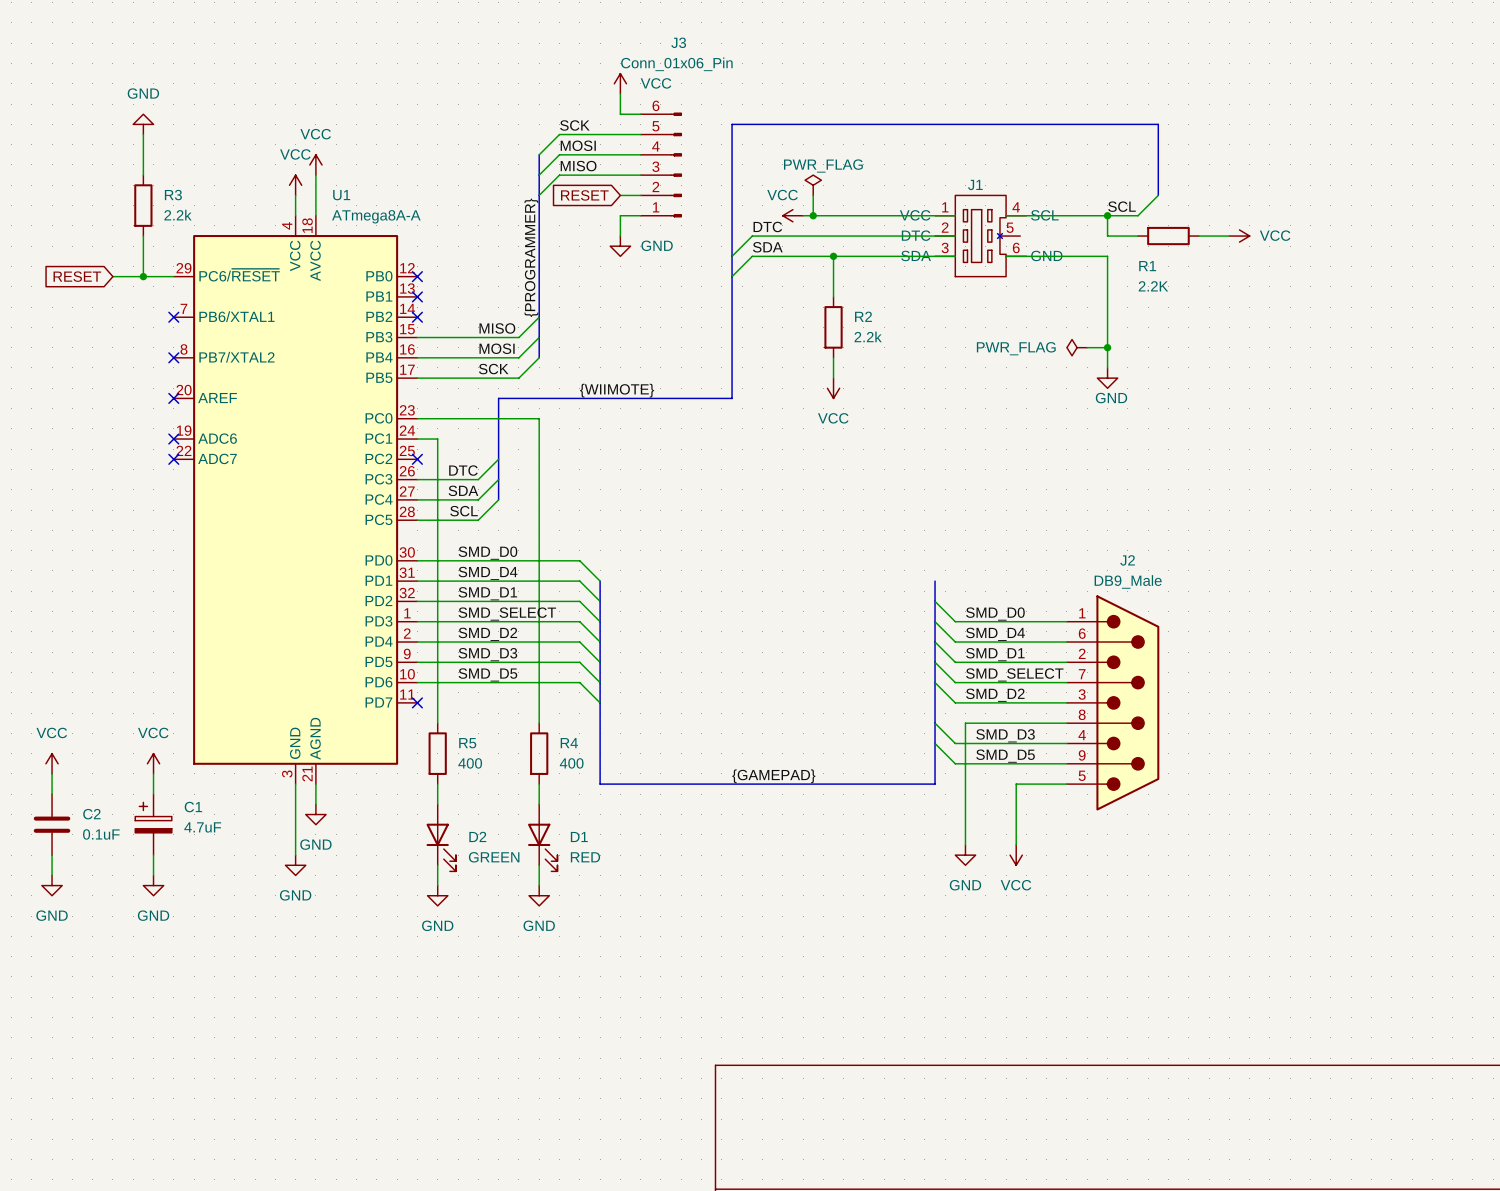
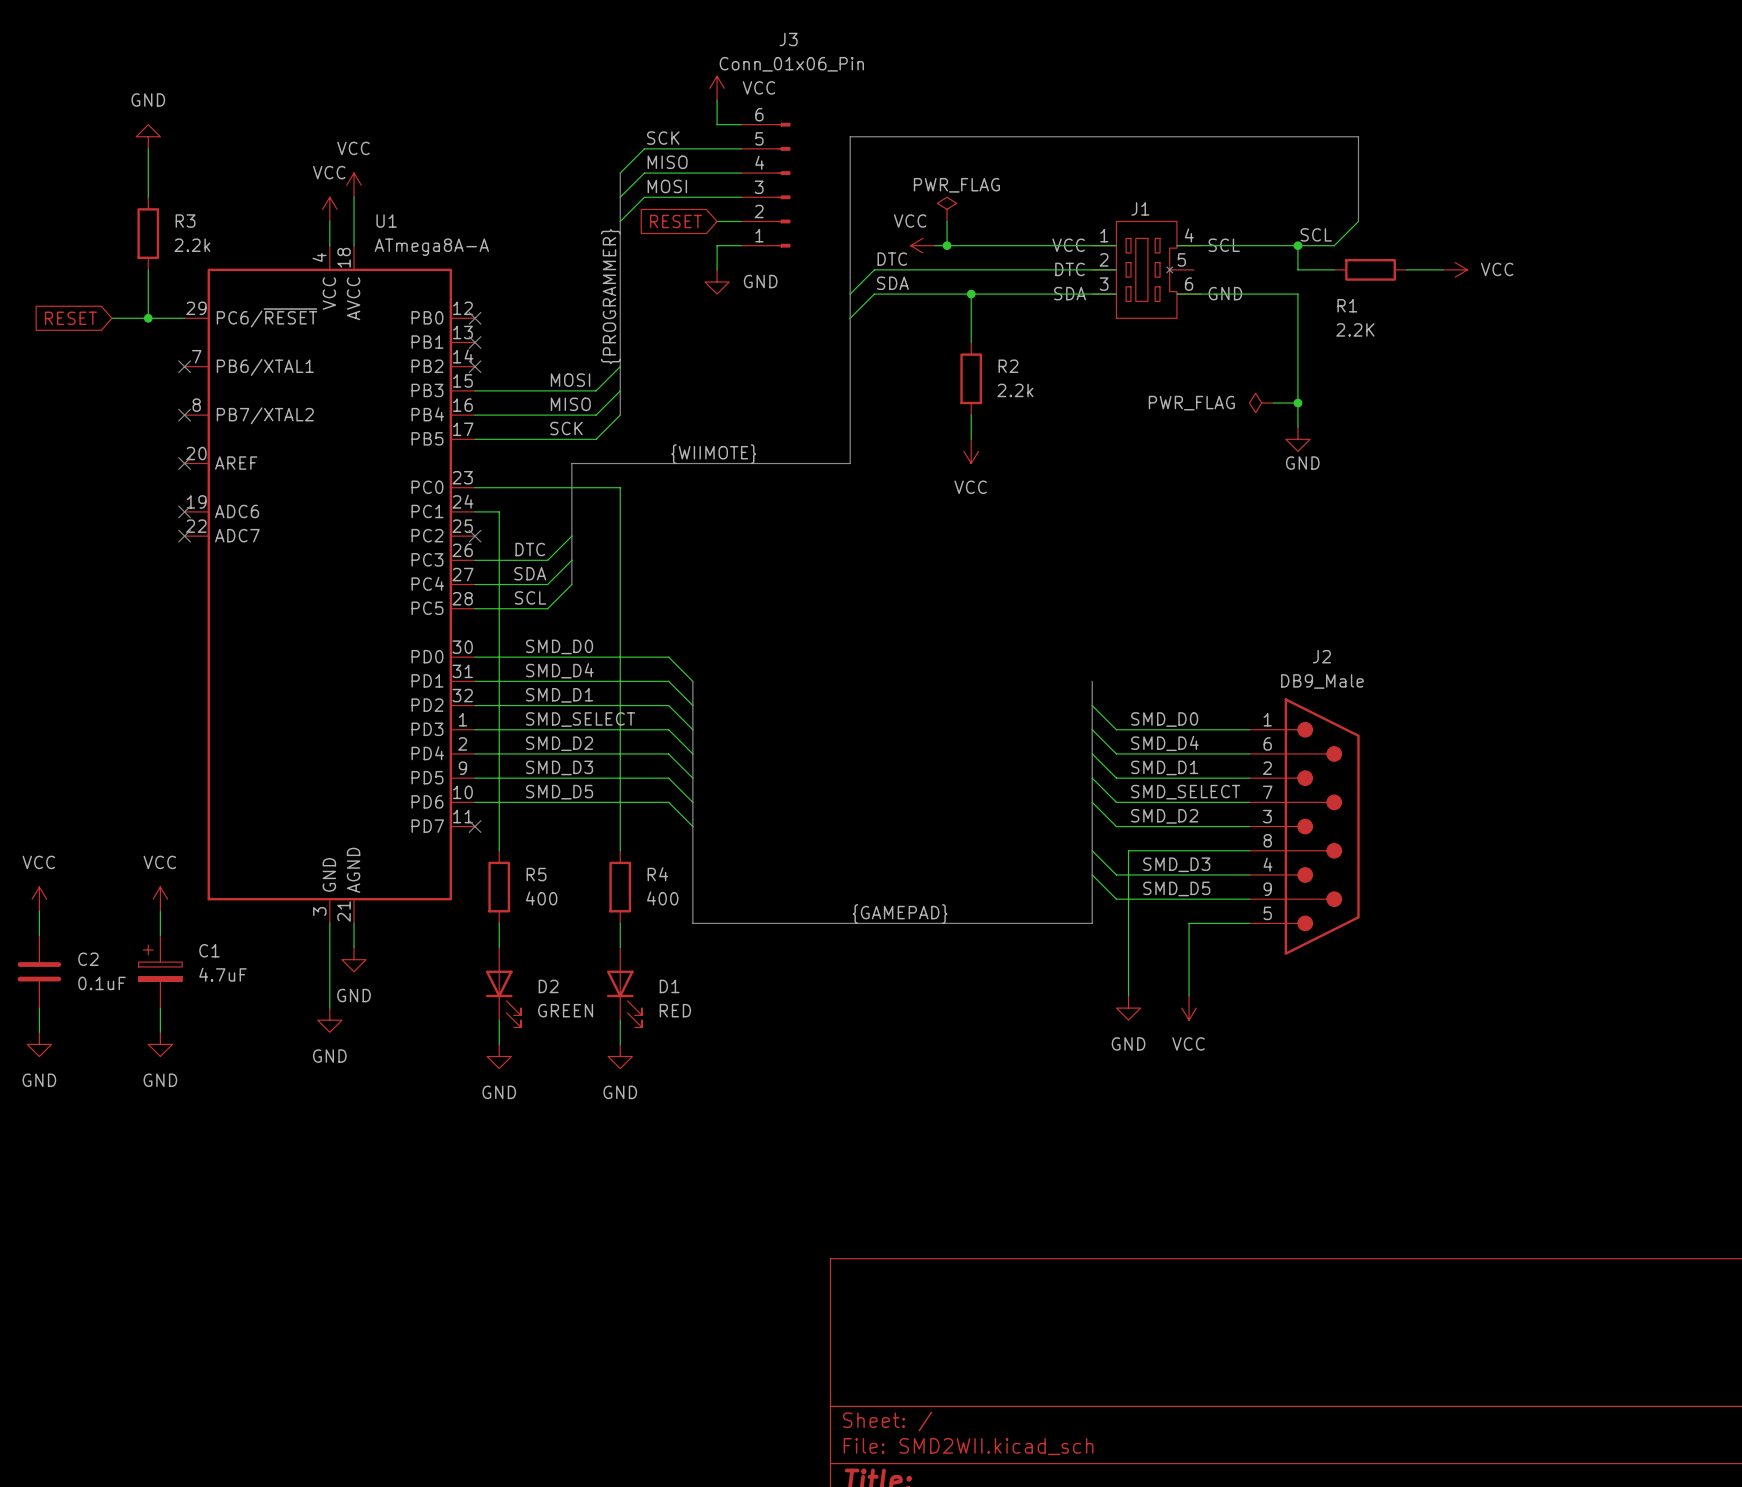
label: MOSI (578, 145) -> MISO (667, 162)
label: MISO (578, 166) -> MOSI (667, 186)
label: MISO (497, 328) -> MOSI (570, 380)
label: MOSI (497, 348) -> MISO (570, 404)

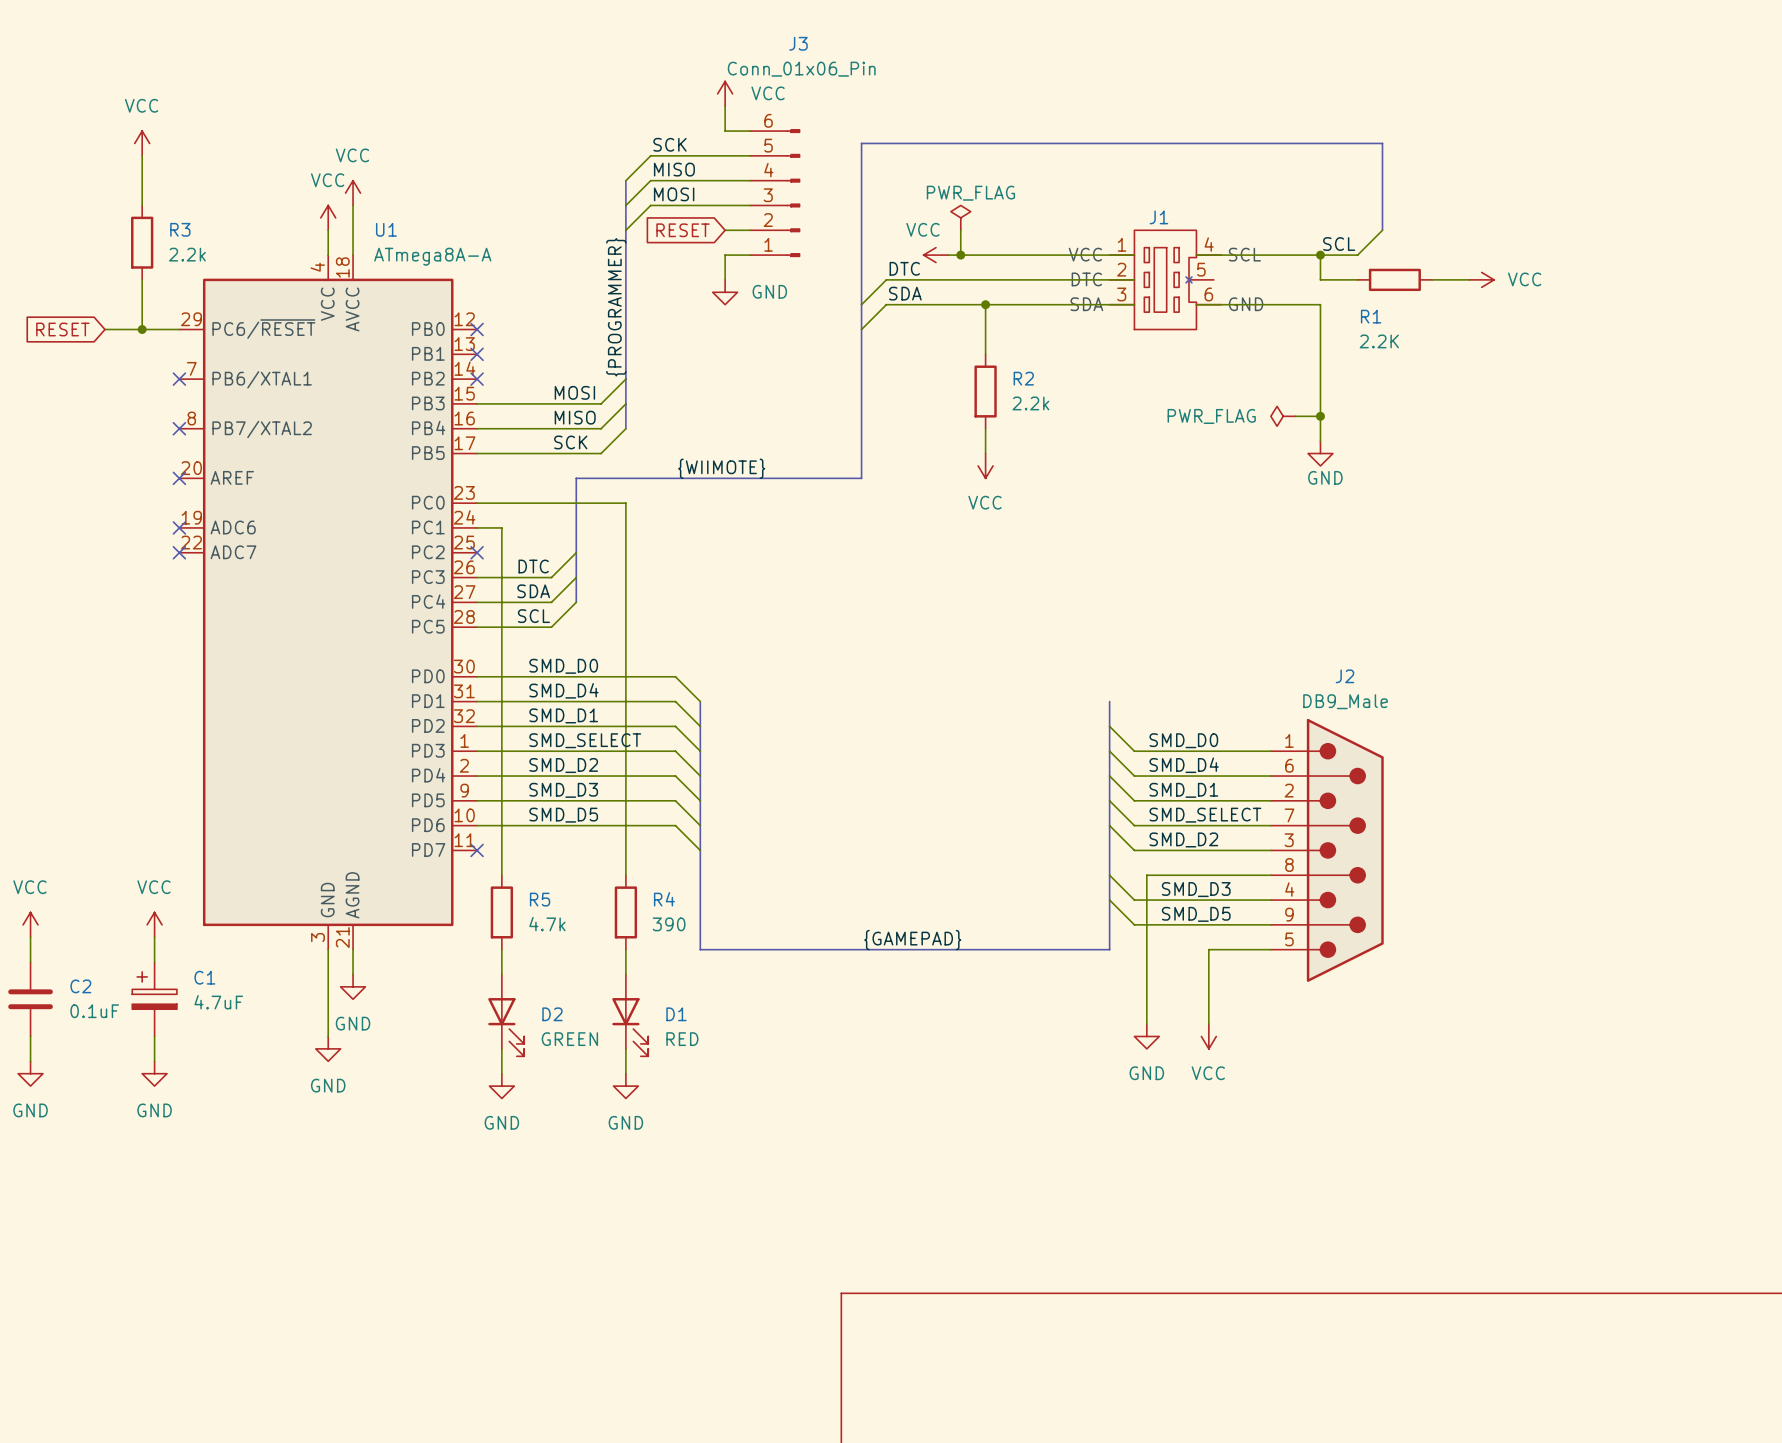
power symbol: GND (148, 136) -> VCC (142, 143)
R5 value: 400 (541, 898) -> 4.7k (547, 924)
R4 value: 400 (662, 898) -> 390 (669, 924)

